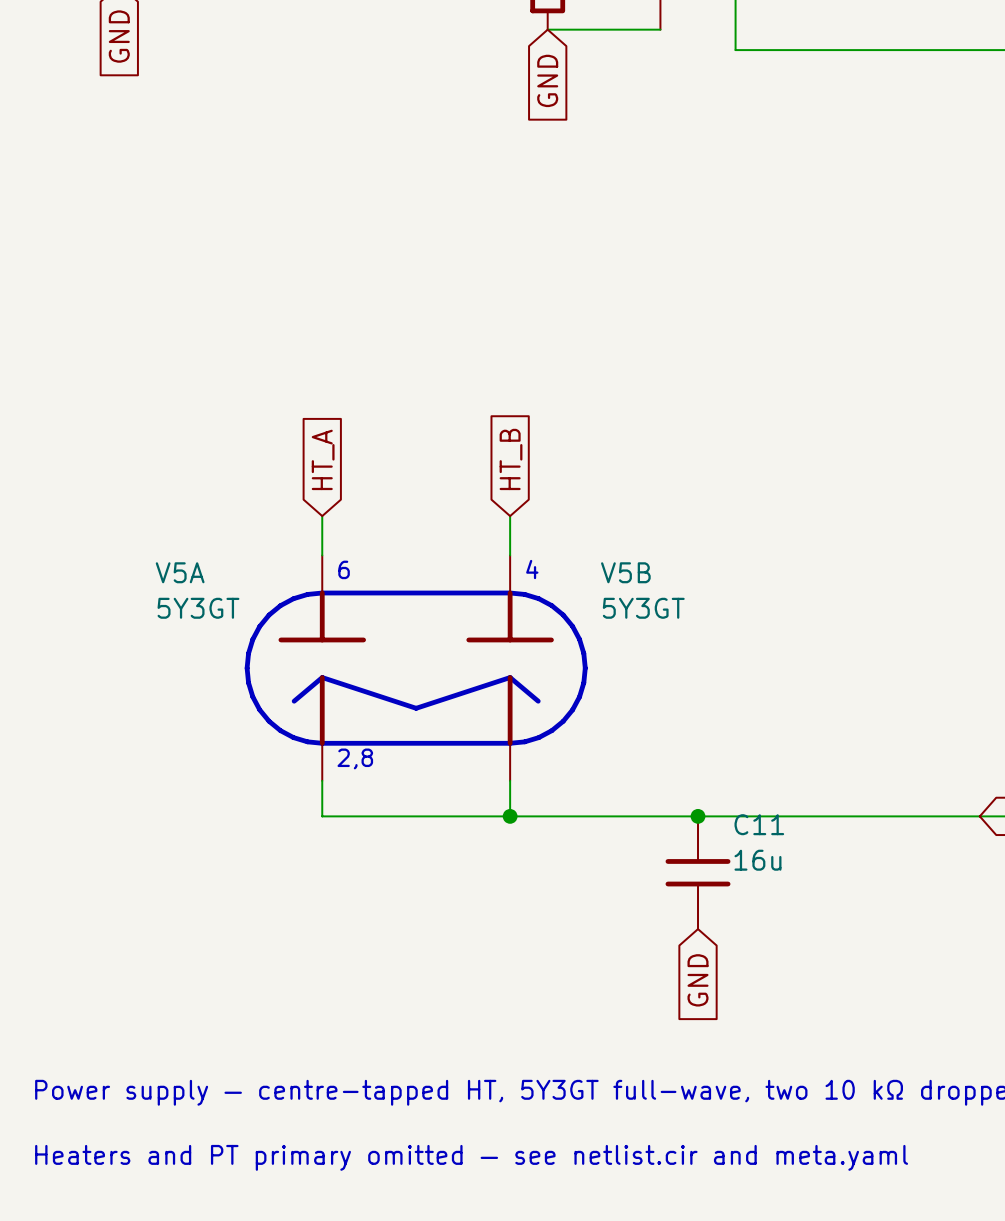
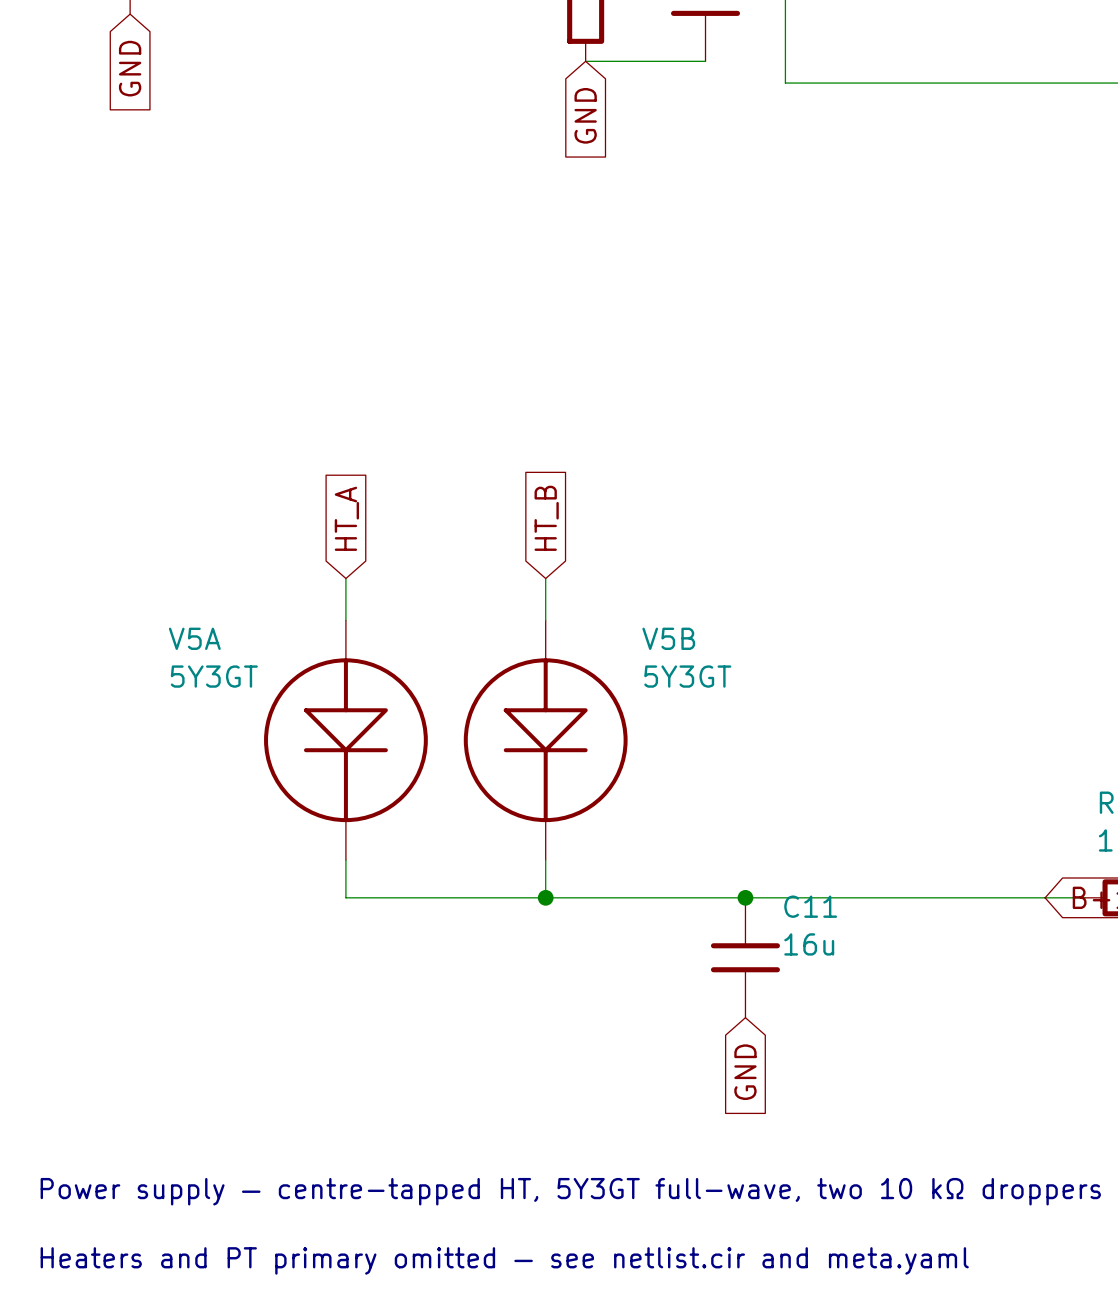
V5A symbol: [278, 555, 366, 781] -> [264, 620, 428, 861]
V5B symbol: [466, 555, 554, 781] -> [463, 620, 628, 861]
text: 6 (344, 569) -> none
text: 4 (532, 569) -> none
line: (322, 593) (293, 598) (280, 605) (259, 626) (248, 653) (248, 682) (259, 709) (280, 730) (293, 737) (322, 743) (524, 741) (551, 730) (572, 709) (579, 696) (585, 668) (579, 639) (563, 615) (538, 598) (510, 593) (322, 593) -> none
line: (294, 701) (322, 677) (416, 708) (510, 677) (538, 701) -> none
text: 2,8 (355, 758) -> none

